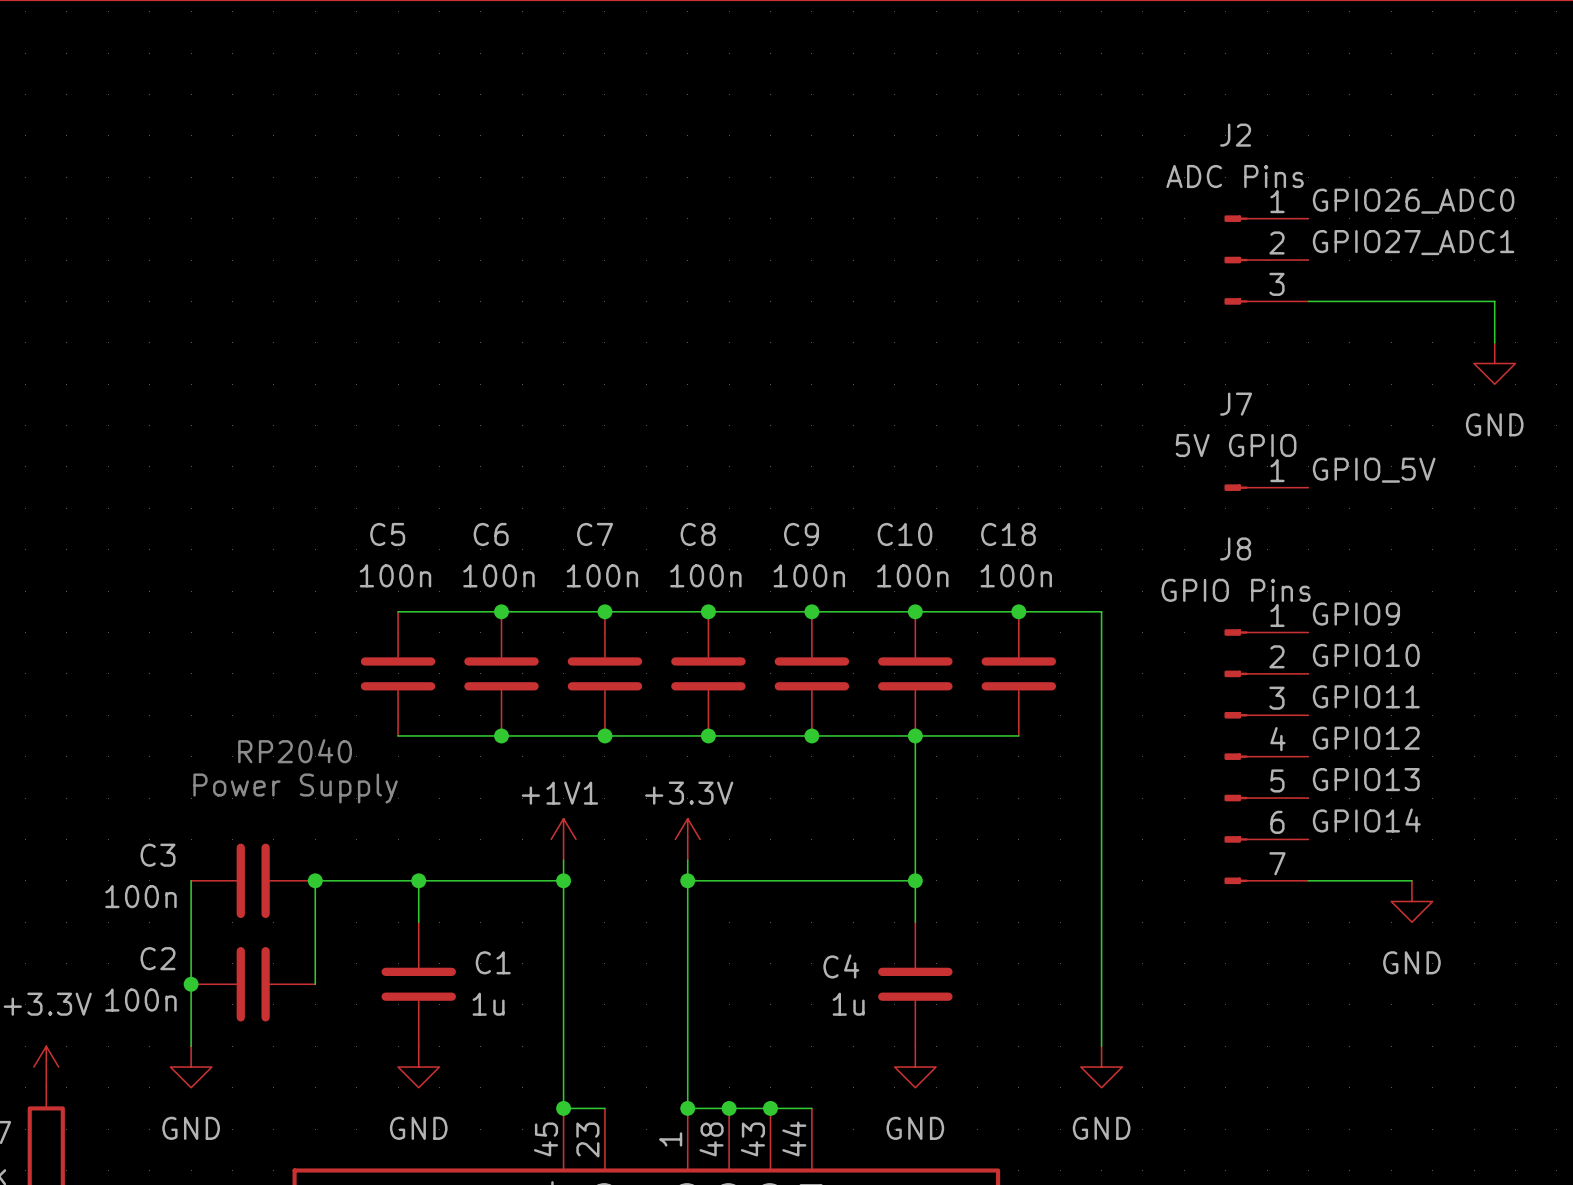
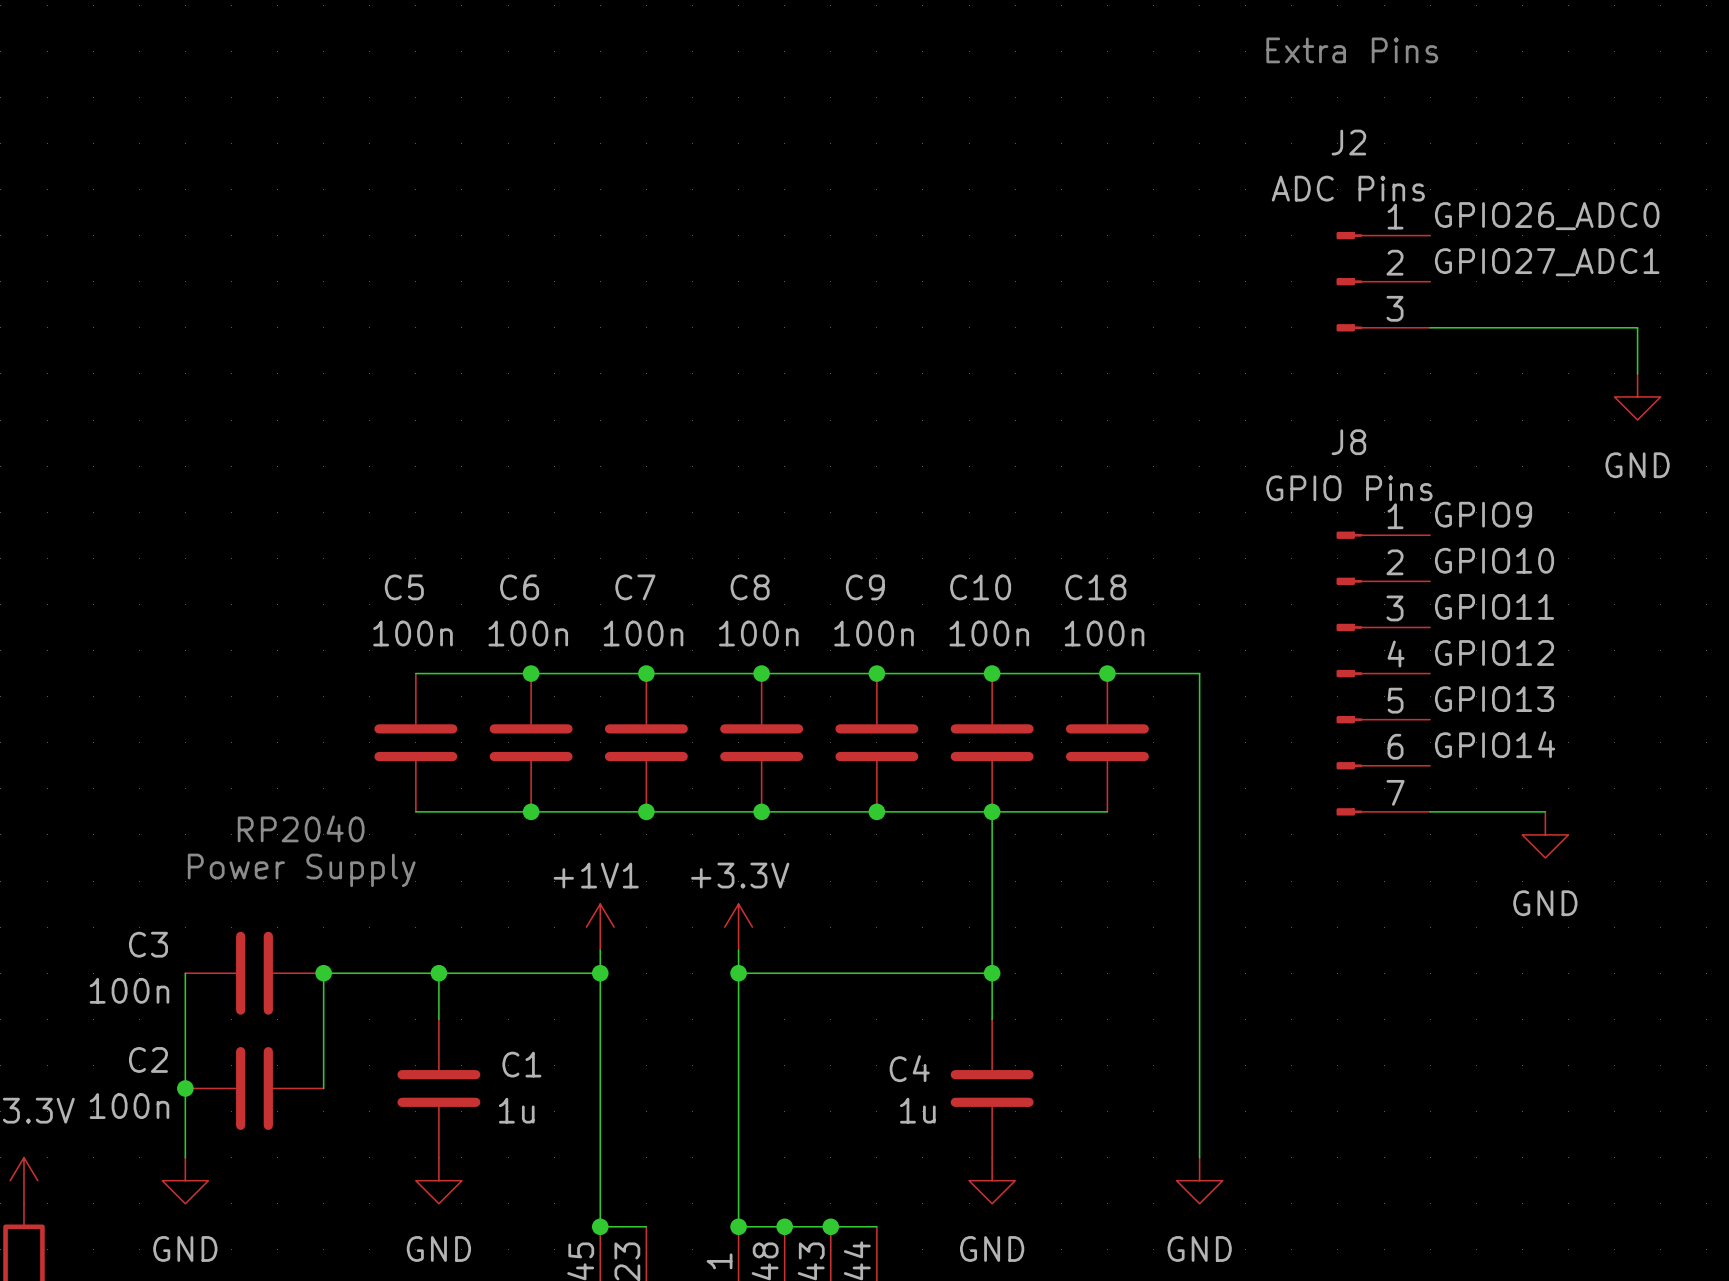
text: none -> Extra Pins (1352, 50)
label: GPIO_5V (1374, 470) -> GPIO9 (1483, 514)
J7: 5V GPIO (1266, 487) -> none
label: GPIO9 (1356, 614) -> none
label position: GPIO10 (1366, 655) -> GPIO10 (1494, 560)
label position: GPIO11 (1366, 696) -> GPIO11 (1494, 606)
label position: GPIO12 (1366, 738) -> GPIO12 (1494, 652)
J8 position: (1266, 756) -> (1383, 673)
label position: GPIO13 (1366, 779) -> GPIO13 (1494, 699)
label position: GPIO14 (1366, 820) -> GPIO14 (1495, 744)
wire: (1308, 880) (1411, 880) -> (1430, 811) (1545, 811)
power symbol position: GND (1411, 901) -> GND (1545, 834)

